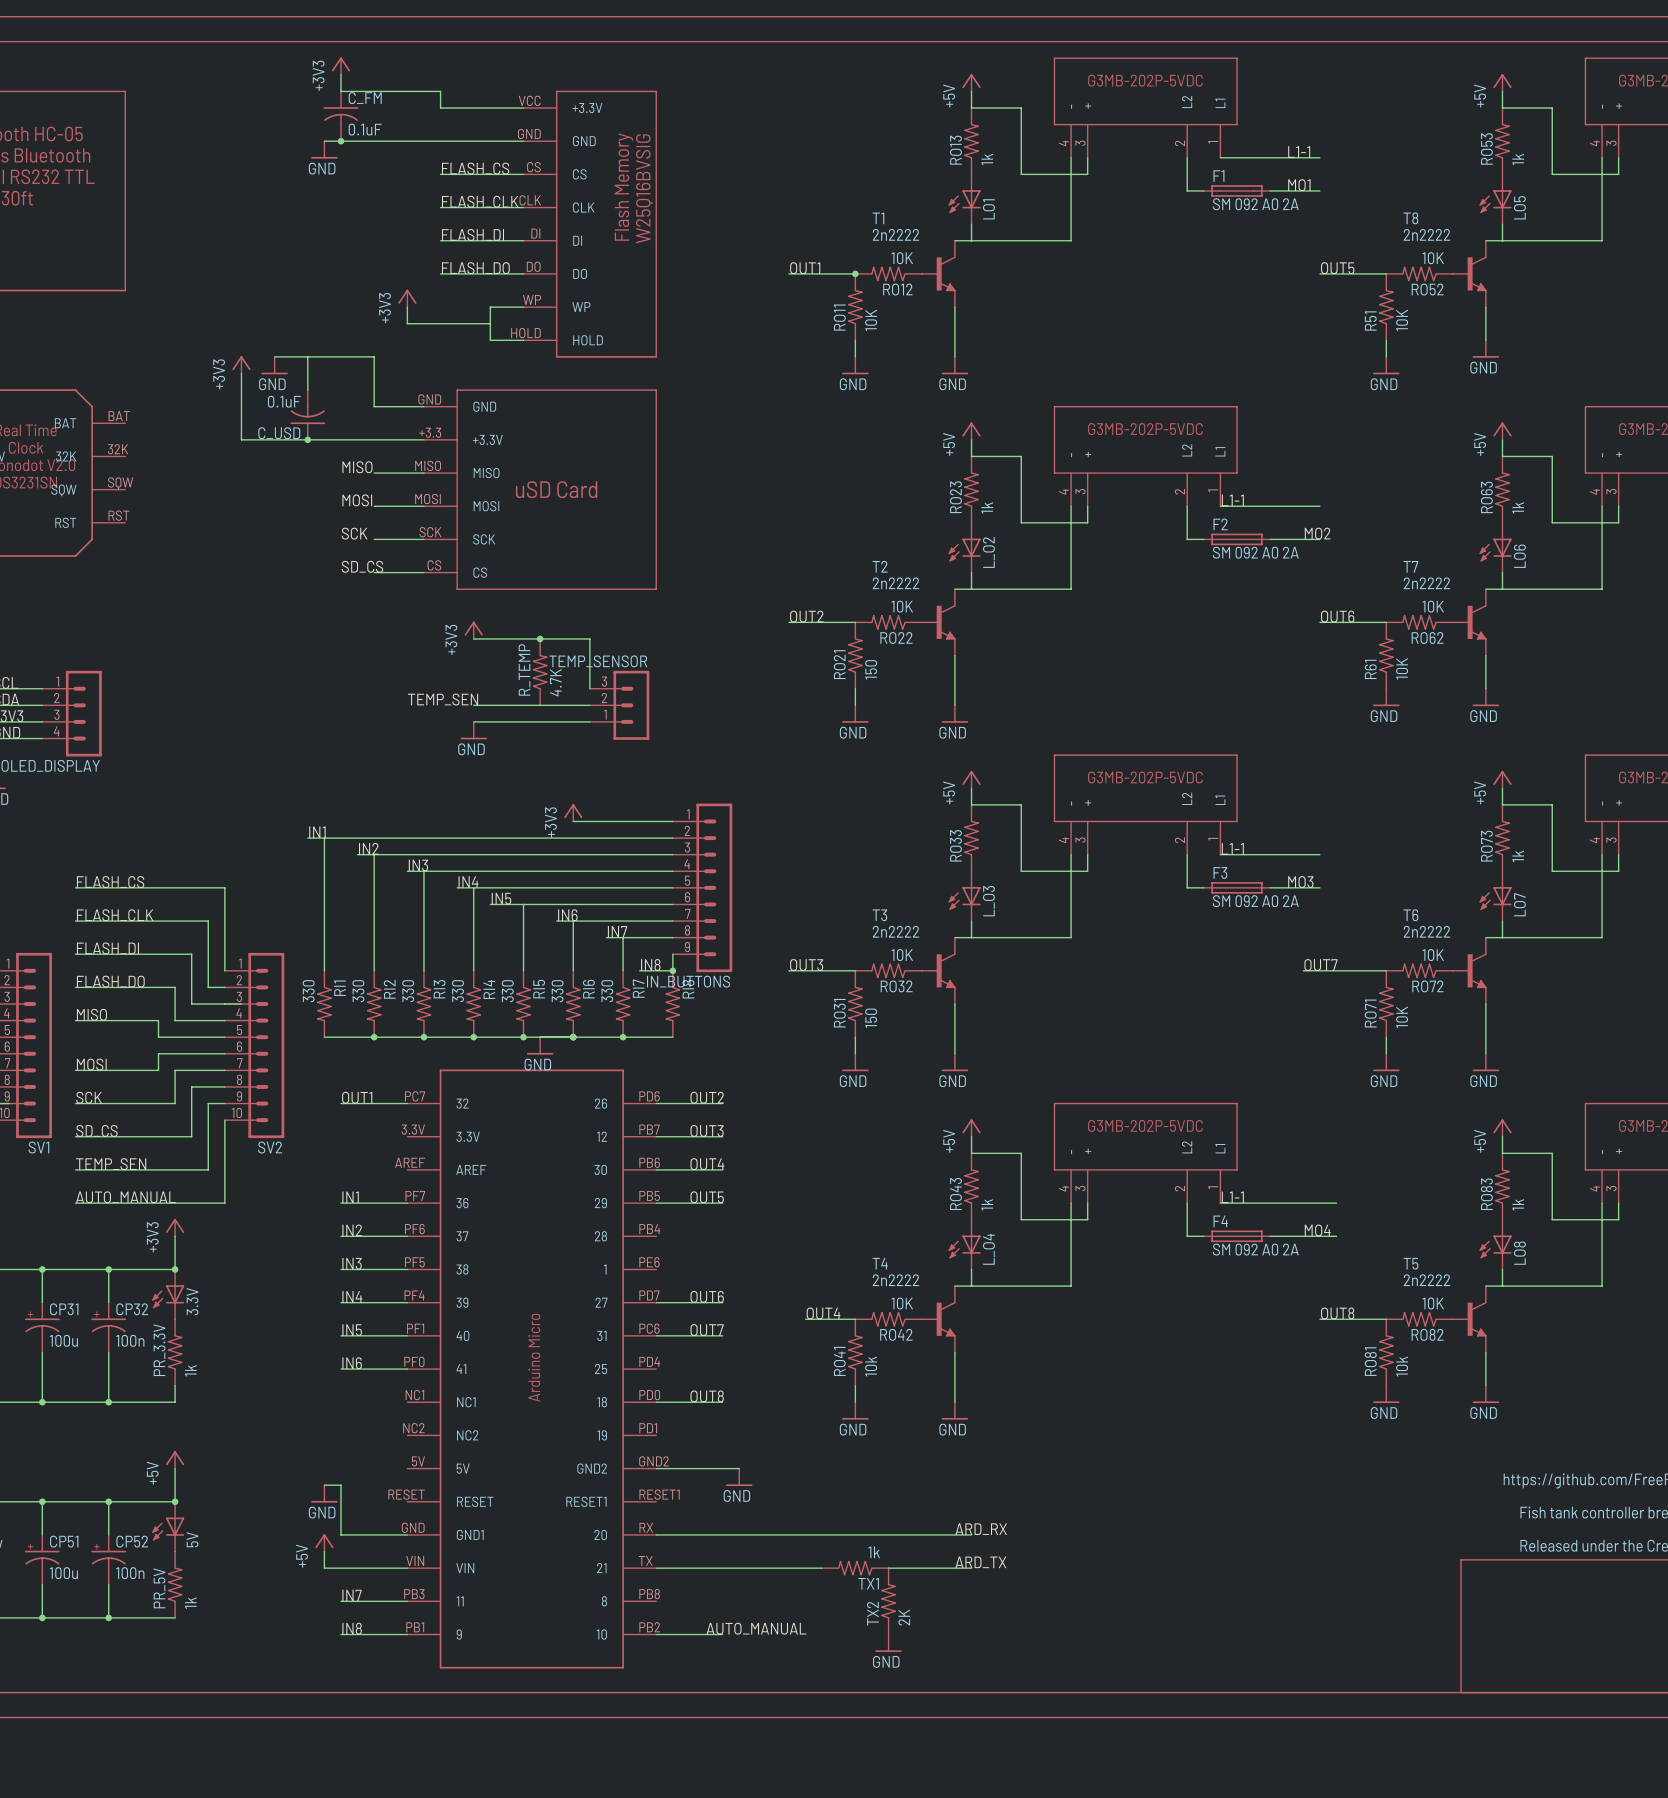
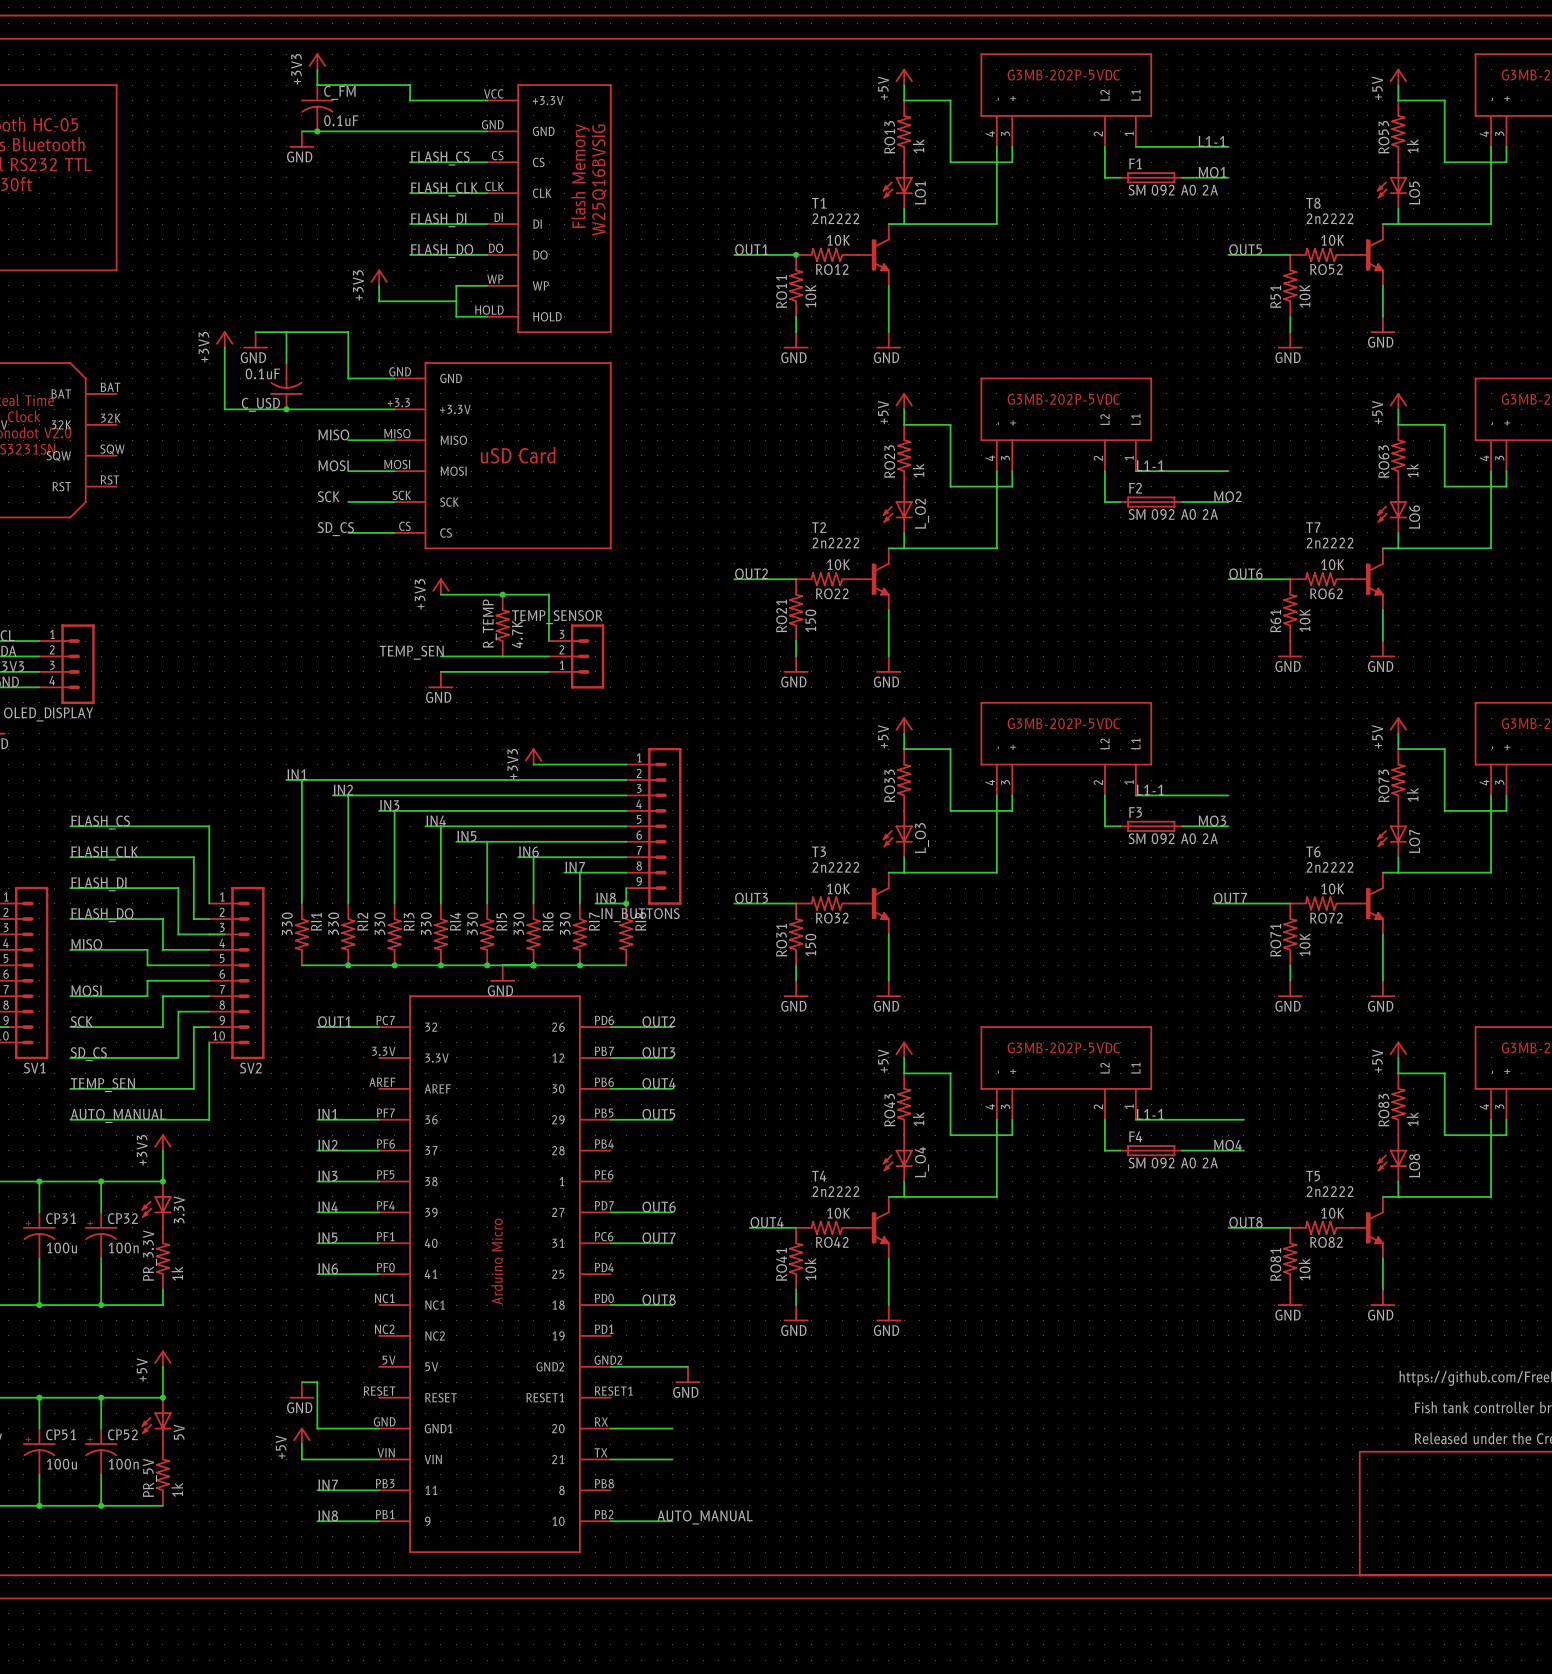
label: ARD_RX (981, 1529) -> none
wire: (722, 1534) (971, 1534) -> none
label: ARD_TX (980, 1562) -> none
wire: (722, 1568) (822, 1568) -> none
TX1: 1k (855, 1568) -> none
wire: (888, 1568) (971, 1568) -> none
TX2: 2K (888, 1601) -> none
power symbol: GND (888, 1643) -> none

